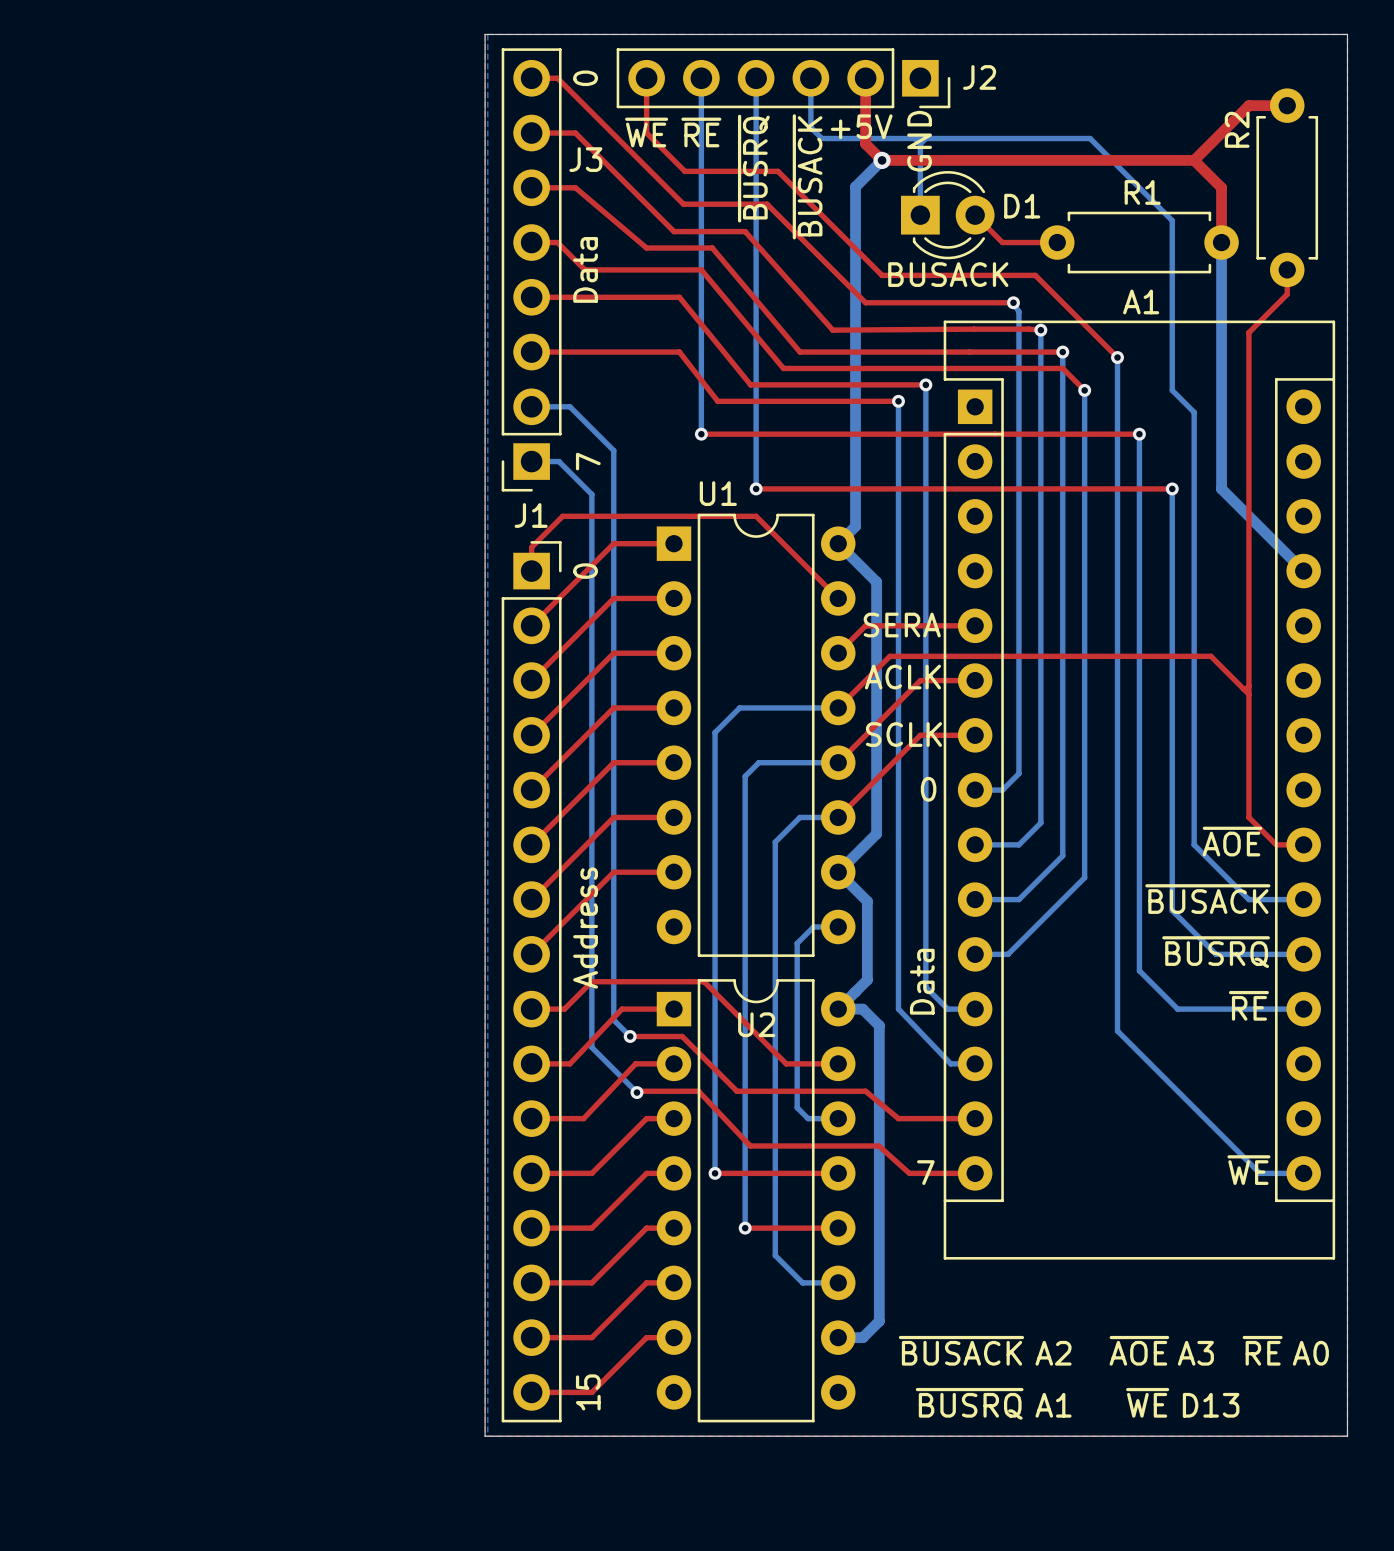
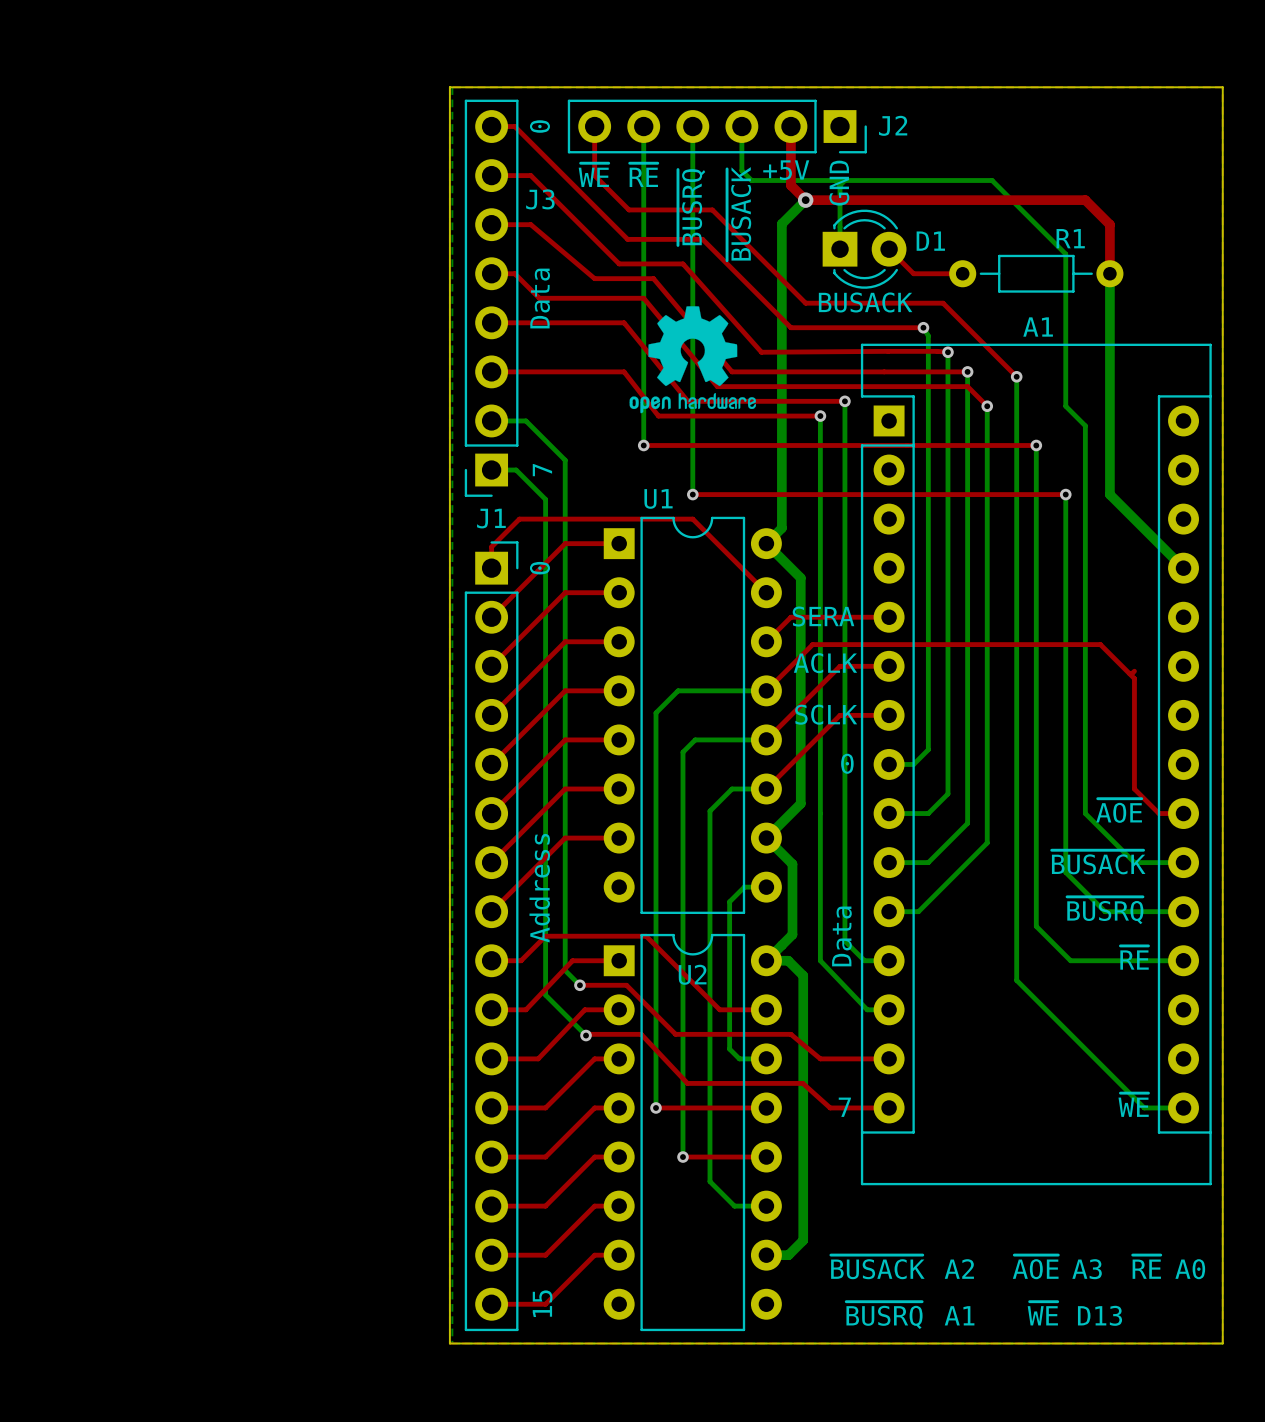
top track: (1287, 105) (1248, 105) (1194, 160) -> none
R2: (1287, 187) -> none
R1 footprint: [1040, 211, 1239, 274] -> [949, 254, 1124, 293]
top track: (1287, 269) (1287, 294) (1248, 332) (1248, 694) -> none
drawing: none -> [629, 306, 757, 414]

